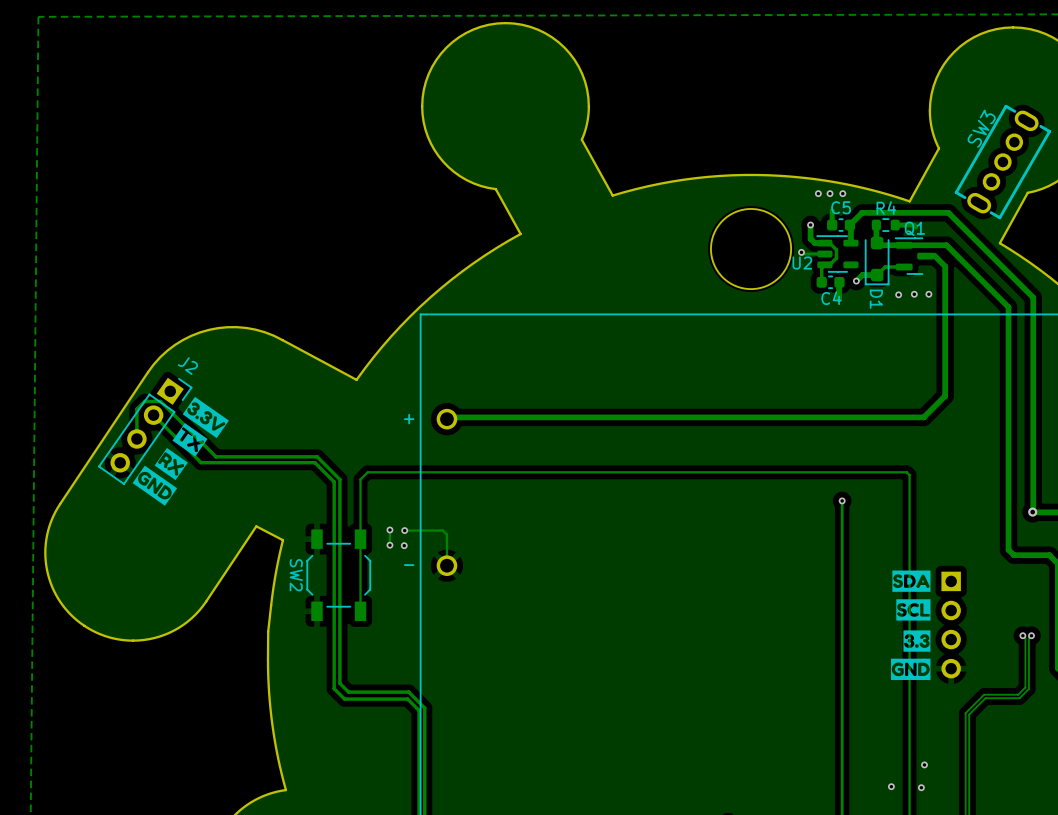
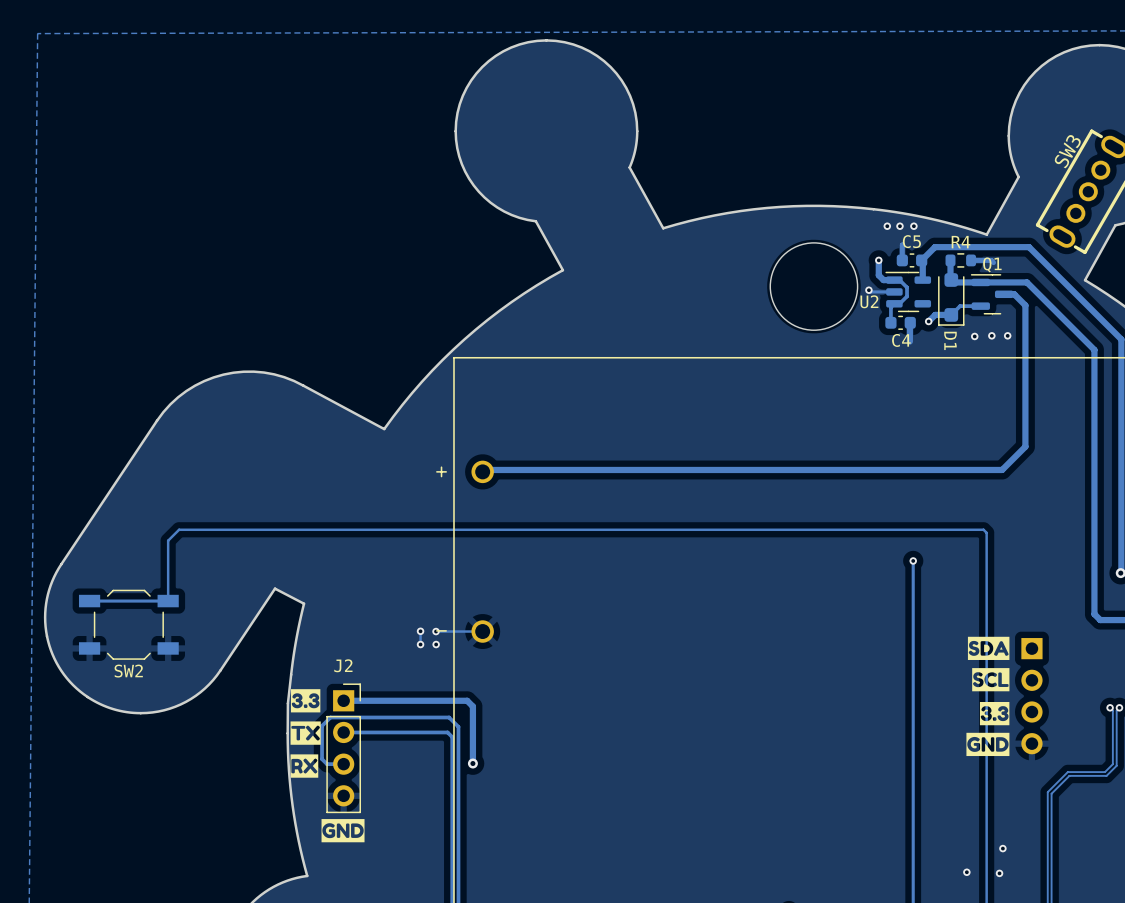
drawing: [132, 396, 229, 506] -> none
track: (153, 415) (201, 462) (314, 462) (334, 481) (334, 688) (344, 699) (407, 699) (419, 710) -> (343, 732) (447, 732) (452, 737) (452, 789)
J2 rotation: 0° (145, 431) -> 35° counterclockwise (343, 748)
J2 position: (145, 431) -> (343, 748)
track: (136, 438) (136, 409) (144, 401) (160, 401) (216, 456) (317, 456) (339, 479) (339, 683) (348, 692) (408, 692) (424, 708) -> (343, 764) (327, 764) (322, 759) (322, 725) (330, 717) (449, 717) (458, 726) (458, 786)
track: (367, 472) (360, 479) (361, 610) -> (396, 529) (179, 529) (168, 540) (168, 601) (89, 601)
track: (389, 530) (389, 545) -> none
via: (389, 530) -> none
track: (404, 530) (442, 530) (446, 534) (446, 565) -> (436, 631) (482, 631)
via: (404, 530) -> none
via: (389, 545) -> none
via: (404, 545) -> none
track: none -> (420, 631) (420, 644)
via: none -> (420, 631)
via: none -> (436, 631)
SW2 name position: SW2 (296, 575) -> SW2 (128, 671)
SW2 rotation: 0° (338, 575) -> 90° clockwise (128, 624)
SW2 position: (338, 575) -> (128, 624)
via: none -> (420, 644)
via: none -> (436, 644)
drawing: none -> [290, 689, 321, 778]
track: none -> (343, 700) (467, 700) (472, 706) (472, 763)
via: none -> (472, 763)
drawing: none -> [321, 819, 365, 843]

